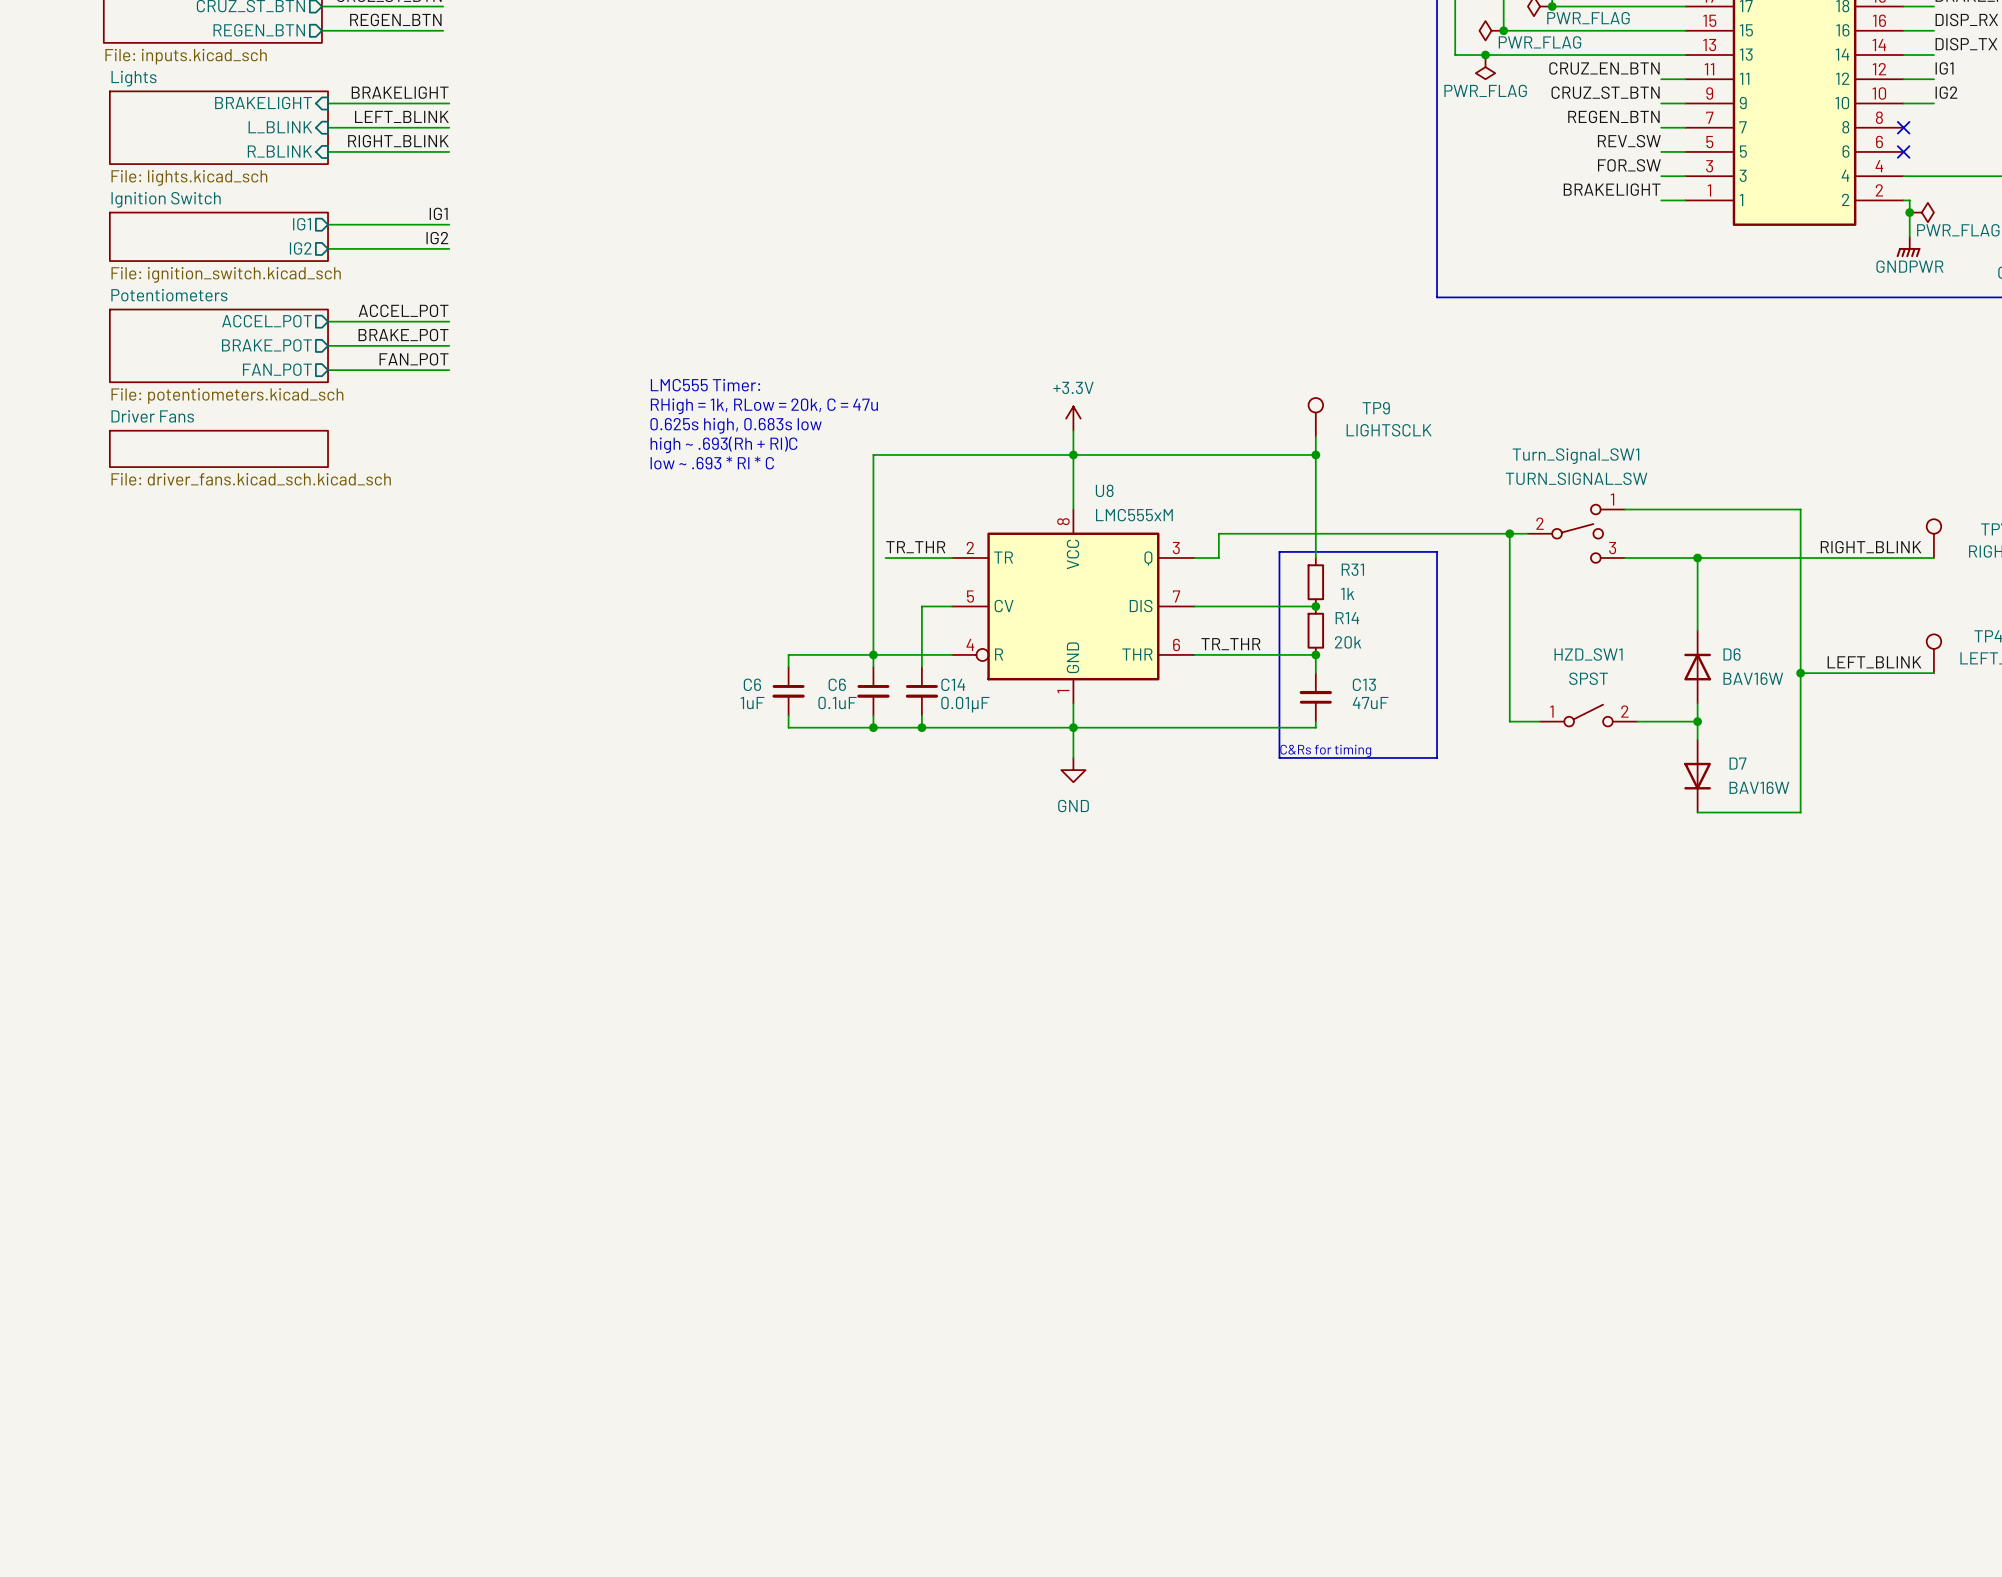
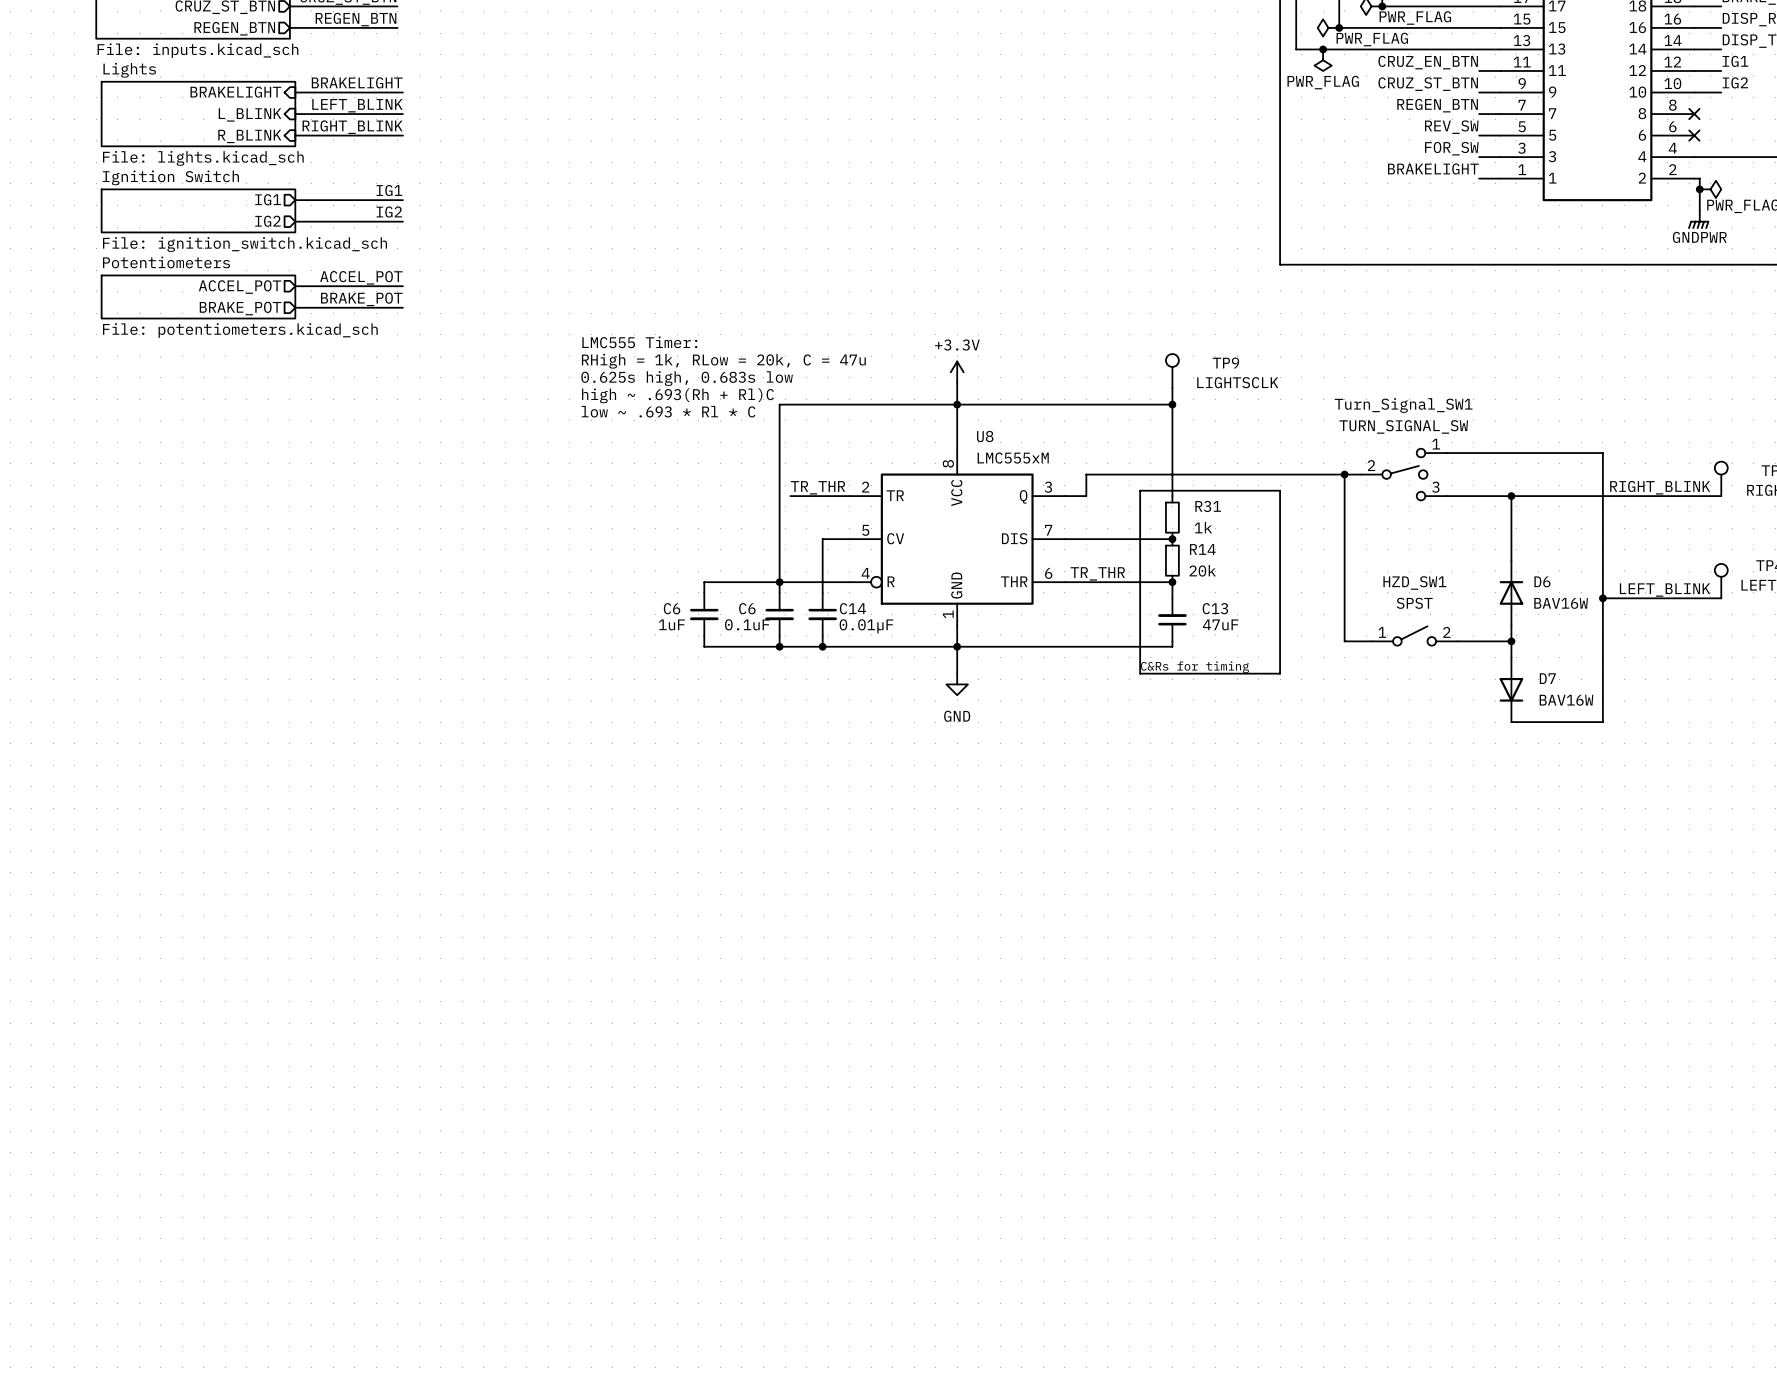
sheet Potentiometers: none -> File: potentiometers.kicad_sch (198, 296)
sheet Potentiometers: File: potentiometers.kicad_sch (218, 345) -> none
label: FAN_POT (414, 359) -> none
sheet pin: FAN_POT (277, 369) -> none
wire: (328, 370) (449, 370) -> none
sheet Driver Fans: File: driver_fans.kicad_sch.kicad_sch (218, 448) -> none

